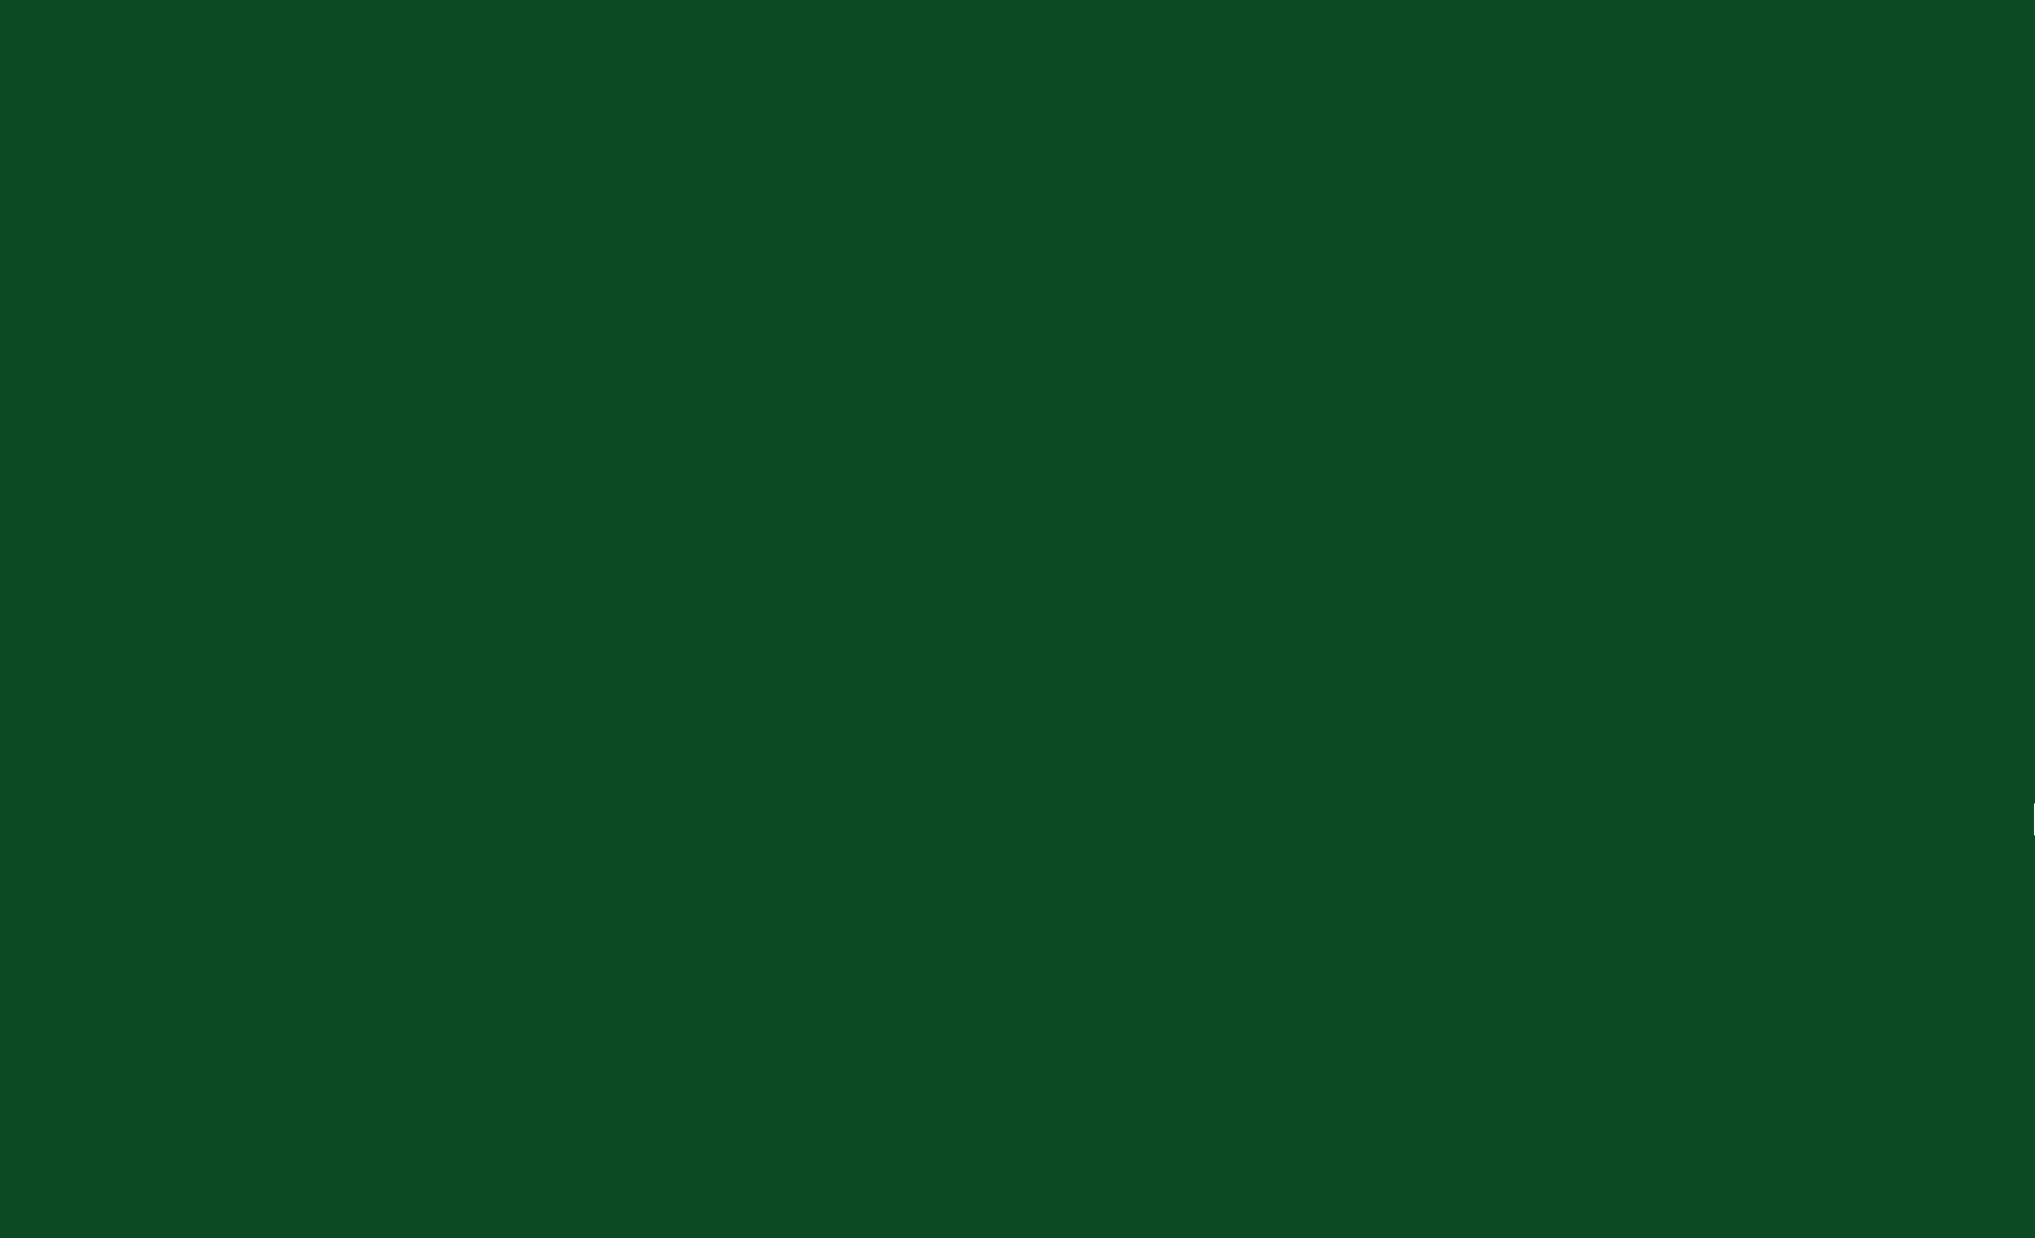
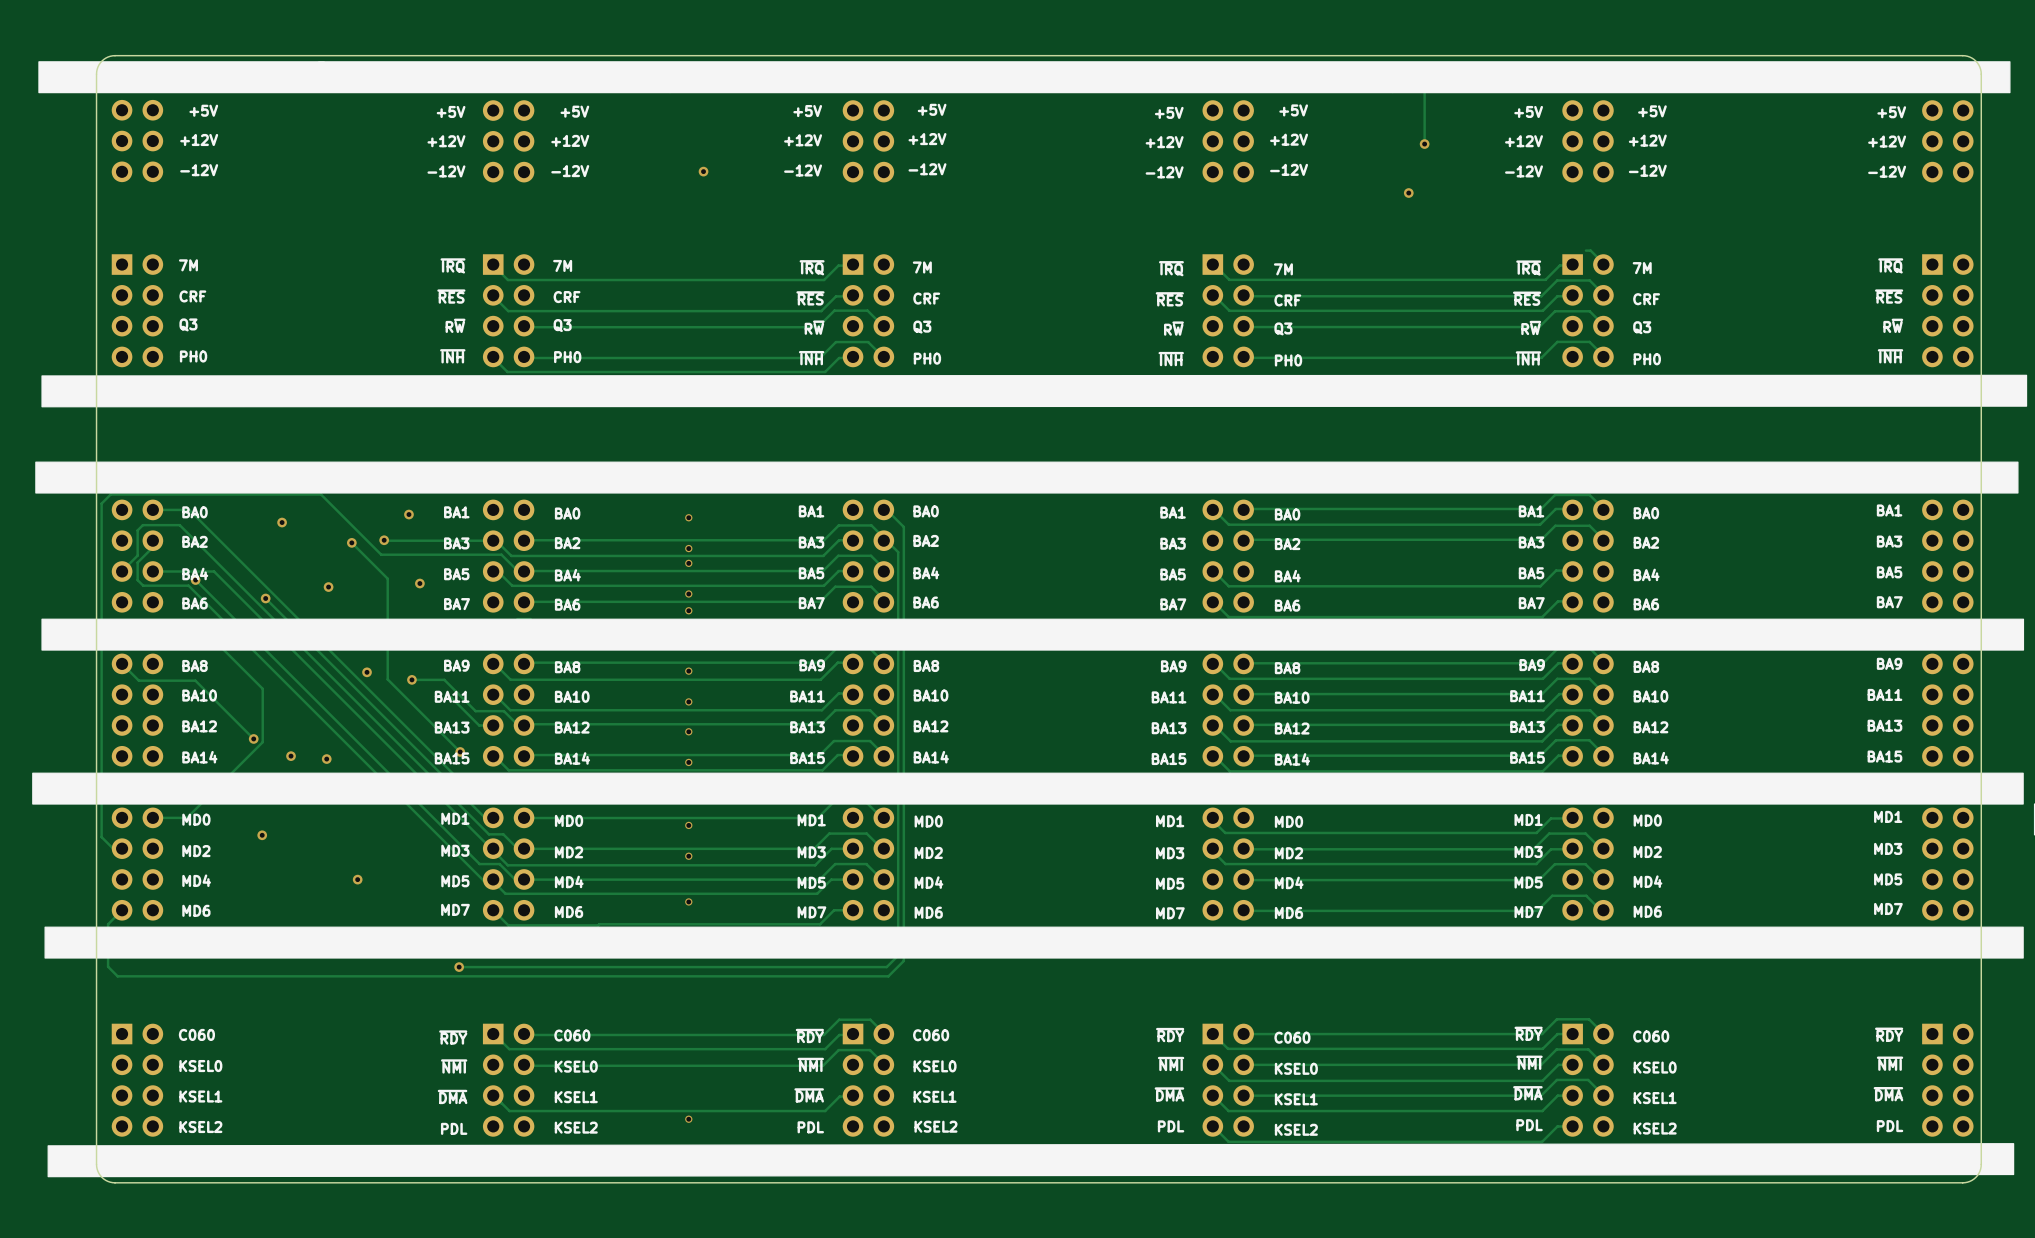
board edge: none -> (1962, 55) (115, 55) (105, 58) (99, 64) (96, 74) (96, 1164) (99, 1173) (105, 1180) (115, 1182) (1962, 1182) (1972, 1180) (1978, 1173) (1981, 1164) (1981, 74) (1975, 61) (1962, 55)
drawing: none -> [38, 61, 2011, 94]
track: none -> (1426, 72) (1424, 74) (1424, 144)
text: none -> +5V (932, 109)
text: none -> +5V (203, 110)
text: none -> +5V (1293, 110)
text: none -> +5V (451, 111)
text: none -> +5V (574, 111)
text: none -> +5V (807, 111)
text: none -> +5V (1528, 111)
text: none -> +5V (1652, 111)
text: none -> +5V (1169, 112)
text: none -> +5V (1891, 112)
part: none -> (137, 125)
part: none -> (508, 125)
part: none -> (868, 125)
part: none -> (1228, 125)
part: none -> (1588, 125)
part: none -> (1947, 125)
text: none -> +12V (199, 139)
text: none -> +12V (927, 139)
text: none -> +12V (1289, 139)
text: none -> +12V (570, 140)
text: none -> +12V (803, 140)
text: none -> +12V (1647, 140)
text: none -> +12V (446, 141)
text: none -> +12V (1524, 141)
text: none -> +12V (1887, 141)
text: none -> +12V (1164, 142)
via: none -> (1424, 144)
text: none -> -12V (927, 169)
text: none -> -12V (1289, 169)
text: none -> -12V (199, 170)
text: none -> -12V (803, 170)
text: none -> -12V (1647, 170)
text: none -> -12V (446, 171)
text: none -> -12V (570, 171)
via: none -> (703, 171)
text: none -> -12V (1524, 171)
text: none -> -12V (1887, 171)
text: none -> -12V (1164, 172)
via: none -> (1408, 193)
track: none -> (1585, 250) (1590, 250) (1604, 263)
track: none -> (493, 264) (507, 280) (824, 280) (838, 265) (853, 265)
track: none -> (1212, 264) (1229, 279) (1545, 279) (1559, 265) (1574, 265)
text: none -> 7M (188, 265)
text: none -> ~{IRQ} (453, 265)
text: none -> 7M (562, 265)
text: none -> ~{IRQ} (1890, 265)
text: none -> ~{IRQ} (812, 267)
text: none -> 7M (922, 267)
text: none -> ~{IRQ} (1171, 268)
text: none -> ~{IRQ} (1528, 268)
text: none -> 7M (1642, 268)
text: none -> 7M (1283, 269)
track: none -> (1604, 294) (1589, 280) (1557, 280) (1541, 296) (1243, 295)
track: none -> (493, 295) (508, 311) (821, 311) (836, 296) (853, 296)
track: none -> (1212, 295) (1229, 310) (1542, 310) (1557, 296) (1574, 296)
text: none -> CRF (192, 296)
text: none -> ~{RES} (451, 296)
text: none -> ~{RES} (1889, 296)
text: none -> CRF (567, 297)
text: none -> ~{RES} (810, 298)
text: none -> CRF (926, 298)
text: none -> ~{RES} (1527, 298)
text: none -> ~{RES} (1169, 299)
text: none -> CRF (1646, 299)
text: none -> CRF (1287, 300)
text: none -> Q3 (188, 324)
text: none -> R~{W} (455, 325)
text: none -> Q3 (562, 325)
track: none -> (1604, 325) (1589, 311) (1555, 311) (1539, 327) (1243, 326)
text: none -> R~{W} (1893, 325)
part: none -> (137, 326)
part: none -> (508, 326)
track: none -> (524, 326) (817, 327) (834, 310) (867, 310) (883, 326)
part: none -> (868, 326)
part: none -> (1228, 326)
part: none -> (1588, 326)
part: none -> (1947, 326)
text: none -> R~{W} (814, 327)
text: none -> Q3 (922, 327)
text: none -> R~{W} (1531, 327)
text: none -> Q3 (1642, 327)
text: none -> R~{W} (1173, 328)
text: none -> Q3 (1283, 328)
text: none -> PH0 (193, 356)
text: none -> ~{INH} (452, 356)
track: none -> (493, 356) (507, 372) (825, 372) (839, 358) (853, 358)
track: none -> (524, 356) (820, 358) (835, 342) (868, 342) (884, 358)
track: none -> (1243, 356) (1541, 357) (1557, 341) (1589, 341) (1605, 357)
text: none -> ~{INH} (1890, 356)
text: none -> PH0 (567, 357)
text: none -> ~{INH} (811, 358)
text: none -> PH0 (927, 358)
text: none -> ~{INH} (1528, 358)
text: none -> ~{INH} (1171, 359)
text: none -> PH0 (1647, 359)
text: none -> PH0 (1288, 360)
drawing: none -> [41, 374, 2028, 408]
drawing: none -> [35, 461, 2019, 494]
track: none -> (1572, 508) (1555, 508) (1540, 524) (1228, 524) (1213, 509)
track: none -> (152, 509) (189, 509) (461, 781)
track: none -> (883, 509) (885, 508) (903, 526) (903, 960) (888, 976) (117, 976) (108, 966) (108, 924) (122, 910)
track: none -> (1603, 509) (1589, 494) (1555, 494) (1541, 508) (1243, 509)
text: none -> BA1 (1889, 510)
text: none -> BA1 (811, 511)
text: none -> BA0 (926, 511)
text: none -> BA1 (1531, 511)
text: none -> BA0 (195, 512)
text: none -> BA1 (456, 512)
text: none -> BA1 (1173, 512)
text: none -> BA0 (567, 513)
text: none -> BA0 (1646, 513)
via: none -> (408, 514)
text: none -> BA0 (1287, 514)
via: none -> (688, 517)
via: none -> (282, 522)
track: none -> (885, 539) (898, 552) (898, 955) (886, 967) (459, 967)
track: none -> (885, 539) (871, 525) (838, 525) (823, 540) (524, 540)
track: none -> (152, 540) (152, 547) (137, 562) (137, 580) (143, 585) (188, 585) (483, 880) (492, 880) (505, 893) (817, 893) (831, 879) (852, 879)
via: none -> (384, 540)
track: none -> (855, 540) (839, 540) (823, 555) (511, 555) (495, 540) (384, 540)
text: none -> BA2 (926, 540)
track: none -> (1603, 540) (1589, 525) (1555, 525) (1541, 539) (1243, 540)
text: none -> BA2 (195, 541)
text: none -> BA3 (1889, 541)
track: none -> (351, 542) (387, 578) (387, 679) (460, 751)
via: none -> (351, 542)
text: none -> BA3 (811, 542)
text: none -> BA3 (1531, 542)
text: none -> BA2 (1646, 542)
text: none -> BA3 (456, 543)
text: none -> BA2 (567, 543)
text: none -> BA3 (1173, 543)
text: none -> BA2 (1287, 544)
via: none -> (688, 548)
via: none -> (688, 563)
track: none -> (1572, 570) (1556, 570) (1540, 586) (1228, 586) (1213, 570)
track: none -> (122, 571) (137, 555) (137, 530) (142, 525) (179, 525) (488, 834) (503, 834) (517, 848) (814, 848) (829, 833) (866, 833) (881, 848)
track: none -> (152, 571) (214, 571) (507, 865) (815, 865) (831, 848) (852, 848)
track: none -> (855, 571) (838, 571) (823, 585) (512, 585) (496, 570) (493, 571)
track: none -> (886, 571) (871, 555) (838, 555) (823, 571) (518, 571) (501, 554) (381, 554) (321, 494) (110, 494) (101, 503) (101, 837) (113, 848) (122, 848)
text: none -> BA5 (1889, 572)
text: none -> BA4 (195, 573)
text: none -> BA5 (811, 573)
text: none -> BA4 (926, 573)
text: none -> BA5 (1531, 573)
text: none -> BA5 (456, 574)
text: none -> BA5 (1173, 574)
text: none -> BA4 (1646, 574)
text: none -> BA4 (567, 575)
text: none -> BA4 (1287, 576)
track: none -> (195, 580) (479, 864) (499, 864) (515, 879) (819, 879) (835, 864) (866, 864) (881, 879)
via: none -> (195, 580)
via: none -> (419, 583)
via: none -> (328, 587)
via: none -> (688, 593)
track: none -> (265, 598) (485, 818) (493, 817)
via: none -> (265, 598)
track: none -> (885, 600) (871, 586) (835, 586) (820, 601) (524, 602)
track: none -> (1572, 601) (1557, 601) (1542, 617) (1228, 617) (1213, 601)
text: none -> BA6 (926, 602)
text: none -> BA7 (1889, 602)
text: none -> BA6 (195, 603)
text: none -> BA7 (811, 603)
text: none -> BA7 (1531, 603)
text: none -> BA7 (457, 604)
text: none -> BA6 (567, 604)
text: none -> BA7 (1173, 604)
text: none -> BA6 (1646, 604)
text: none -> BA6 (1287, 605)
via: none -> (688, 610)
drawing: none -> [41, 618, 2025, 651]
track: none -> (211, 637) (262, 688) (262, 742) (187, 817) (152, 817)
track: none -> (524, 662) (822, 662) (836, 648) (870, 648) (883, 663)
track: none -> (853, 662) (837, 662) (820, 679) (510, 679) (494, 663)
track: none -> (1604, 662) (1590, 649) (1557, 649) (1543, 663) (1243, 663)
track: none -> (122, 663) (138, 680) (195, 680) (253, 738)
track: none -> (1573, 663) (1558, 663) (1542, 678) (1229, 678) (1212, 663)
text: none -> BA9 (1889, 663)
text: none -> BA8 (195, 665)
text: none -> BA9 (456, 665)
text: none -> BA9 (812, 665)
text: none -> BA8 (926, 665)
text: none -> BA9 (1532, 665)
text: none -> BA9 (1173, 666)
text: none -> BA8 (1646, 666)
text: none -> BA8 (567, 667)
text: none -> BA8 (1287, 668)
via: none -> (688, 671)
via: none -> (367, 672)
track: none -> (411, 679) (444, 679) (475, 711) (503, 711) (517, 724) (821, 724) (835, 710) (870, 710) (883, 725)
via: none -> (411, 679)
track: none -> (853, 693) (838, 693) (821, 710) (510, 710) (494, 693)
track: none -> (1604, 693) (1589, 678) (1557, 678) (1542, 694) (1243, 694)
track: none -> (1573, 694) (1559, 694) (1543, 710) (1230, 710) (1212, 694)
text: none -> BA11 (1884, 694)
text: none -> BA10 (199, 695)
text: none -> BA10 (931, 695)
text: none -> BA11 (452, 696)
text: none -> BA10 (572, 696)
text: none -> BA11 (807, 696)
text: none -> BA11 (1527, 696)
text: none -> BA10 (1650, 696)
track: none -> (448, 697) (451, 697) (479, 725) (493, 724)
text: none -> BA11 (1169, 697)
text: none -> BA10 (1292, 697)
via: none -> (688, 701)
part: none -> (137, 710)
part: none -> (508, 710)
part: none -> (868, 710)
part: none -> (1228, 710)
part: none -> (1588, 710)
part: none -> (1947, 710)
track: none -> (1573, 724) (1558, 724) (1542, 741) (1230, 741) (1212, 725)
track: none -> (1604, 724) (1590, 710) (1556, 710) (1542, 724) (1243, 725)
text: none -> BA13 (1884, 725)
text: none -> BA12 (199, 726)
text: none -> BA12 (931, 726)
text: none -> BA13 (1527, 726)
text: none -> BA13 (452, 727)
text: none -> BA12 (572, 727)
text: none -> BA13 (807, 727)
text: none -> BA12 (1650, 727)
text: none -> BA13 (1169, 728)
text: none -> BA12 (1292, 728)
via: none -> (688, 731)
via: none -> (253, 738)
via: none -> (460, 751)
track: none -> (524, 755) (819, 755) (833, 741) (870, 741) (883, 756)
track: none -> (853, 755) (837, 755) (822, 770) (508, 770) (493, 755)
track: none -> (1573, 755) (1558, 755) (1542, 771) (1229, 771) (1212, 756)
track: none -> (1604, 755) (1589, 740) (1555, 740) (1540, 755) (1243, 756)
via: none -> (291, 756)
text: none -> BA15 (1884, 756)
text: none -> BA14 (199, 757)
text: none -> BA14 (931, 757)
text: none -> BA15 (1527, 757)
text: none -> BA15 (452, 758)
text: none -> BA14 (572, 758)
text: none -> BA15 (807, 758)
text: none -> BA14 (1651, 758)
via: none -> (326, 759)
text: none -> BA15 (1169, 759)
text: none -> BA14 (1292, 759)
via: none -> (688, 762)
drawing: none -> [32, 772, 2024, 805]
text: none -> MD1 (1888, 816)
track: none -> (1572, 817) (1551, 818) (1536, 832) (1225, 832) (1210, 818)
text: none -> MD1 (455, 818)
track: none -> (881, 818) (867, 803) (832, 803) (817, 818) (522, 818)
text: none -> MD0 (196, 819)
text: none -> MD1 (1528, 819)
text: none -> MD0 (569, 820)
text: none -> MD1 (811, 820)
text: none -> MD0 (1647, 820)
text: none -> MD0 (928, 821)
text: none -> MD1 (1170, 821)
text: none -> MD0 (1288, 821)
via: none -> (688, 825)
via: none -> (262, 835)
track: none -> (1572, 848) (1551, 849) (1536, 864) (1225, 864) (1211, 850)
track: none -> (1603, 848) (1601, 849) (1585, 833) (1549, 833) (1533, 849) (1241, 849)
text: none -> MD3 (1888, 848)
text: none -> MD3 (455, 850)
text: none -> MD2 (196, 851)
text: none -> MD2 (569, 852)
text: none -> MD3 (811, 852)
text: none -> MD2 (928, 852)
text: none -> MD3 (1528, 852)
text: none -> MD2 (1647, 852)
text: none -> MD3 (1170, 853)
text: none -> MD2 (1288, 853)
via: none -> (688, 856)
via: none -> (357, 879)
track: none -> (1603, 879) (1601, 880) (1585, 864) (1554, 864) (1539, 880) (1241, 880)
text: none -> MD5 (1888, 879)
text: none -> MD4 (196, 880)
text: none -> MD5 (455, 881)
text: none -> MD4 (569, 881)
text: none -> MD4 (1647, 881)
text: none -> MD5 (811, 882)
text: none -> MD4 (928, 882)
text: none -> MD4 (1289, 882)
text: none -> MD5 (1528, 882)
text: none -> MD5 (1170, 883)
via: none -> (688, 901)
text: none -> MD7 (1888, 908)
text: none -> MD7 (455, 909)
text: none -> MD6 (196, 910)
track: none -> (853, 910) (834, 910) (820, 924) (598, 925) (508, 925) (493, 910)
track: none -> (1603, 910) (1601, 910) (1586, 895) (1552, 895) (1537, 910) (1241, 910)
text: none -> MD6 (1647, 911)
text: none -> MD6 (569, 912)
text: none -> MD7 (811, 912)
text: none -> MD6 (928, 912)
text: none -> MD6 (1288, 912)
text: none -> MD7 (1528, 912)
text: none -> MD7 (1170, 913)
drawing: none -> [44, 926, 2024, 959]
via: none -> (459, 967)
text: none -> ~{RDY} (1528, 1033)
text: none -> C060 (196, 1034)
track: none -> (524, 1034) (823, 1034) (839, 1019) (870, 1019) (885, 1034)
track: none -> (854, 1034) (839, 1034) (825, 1049) (509, 1049) (495, 1034)
track: none -> (1573, 1034) (1557, 1034) (1542, 1048) (1228, 1048) (1213, 1034)
track: none -> (1603, 1034) (1589, 1019) (1556, 1019) (1542, 1034) (1243, 1034)
text: none -> ~{RDY} (1889, 1034)
text: none -> C060 (572, 1035)
text: none -> ~{RDY} (809, 1035)
text: none -> C060 (931, 1035)
text: none -> ~{RDY} (1170, 1035)
text: none -> C060 (1651, 1036)
text: none -> ~{RDY} (453, 1037)
text: none -> C060 (1292, 1037)
text: none -> ~{NMI} (1529, 1062)
text: none -> ~{NMI} (1890, 1063)
track: none -> (524, 1064) (823, 1065) (838, 1050) (869, 1050) (885, 1065)
text: none -> ~{NMI} (810, 1064)
text: none -> ~{NMI} (1171, 1064)
track: none -> (1212, 1064) (1229, 1080) (1542, 1080) (1558, 1064) (1573, 1064)
track: none -> (1603, 1064) (1588, 1049) (1556, 1049) (1541, 1064) (1243, 1064)
text: none -> KSEL0 (200, 1066)
text: none -> ~{NMI} (454, 1066)
text: none -> KSEL0 (576, 1066)
text: none -> KSEL0 (935, 1066)
text: none -> KSEL0 (1655, 1067)
text: none -> KSEL0 (1296, 1068)
text: none -> ~{DMA} (1527, 1093)
text: none -> ~{DMA} (1169, 1094)
text: none -> ~{DMA} (1888, 1094)
part: none -> (137, 1095)
part: none -> (508, 1095)
text: none -> ~{DMA} (809, 1095)
part: none -> (868, 1095)
track: none -> (1212, 1095) (1228, 1111) (1542, 1111) (1557, 1095) (1573, 1095)
part: none -> (1228, 1095)
part: none -> (1588, 1095)
track: none -> (1603, 1095) (1588, 1079) (1556, 1079) (1541, 1095) (1243, 1095)
part: none -> (1947, 1095)
text: none -> KSEL1 (200, 1096)
text: none -> ~{DMA} (452, 1096)
track: none -> (854, 1096) (839, 1096) (825, 1111) (509, 1111) (501, 1103)
text: none -> KSEL1 (935, 1096)
text: none -> KSEL1 (576, 1097)
text: none -> KSEL1 (1655, 1098)
text: none -> KSEL1 (1296, 1099)
via: none -> (688, 1119)
text: none -> PDL (1529, 1125)
text: none -> KSEL2 (935, 1126)
text: none -> PDL (1171, 1126)
track: none -> (1212, 1126) (1228, 1141) (1542, 1141) (1557, 1126) (1573, 1126)
text: none -> PDL (1890, 1126)
text: none -> KSEL2 (200, 1127)
text: none -> KSEL2 (576, 1127)
text: none -> PDL (810, 1127)
text: none -> PDL (454, 1128)
text: none -> KSEL2 (1655, 1128)
text: none -> KSEL2 (1296, 1129)
drawing: none -> [47, 1143, 2015, 1178]

